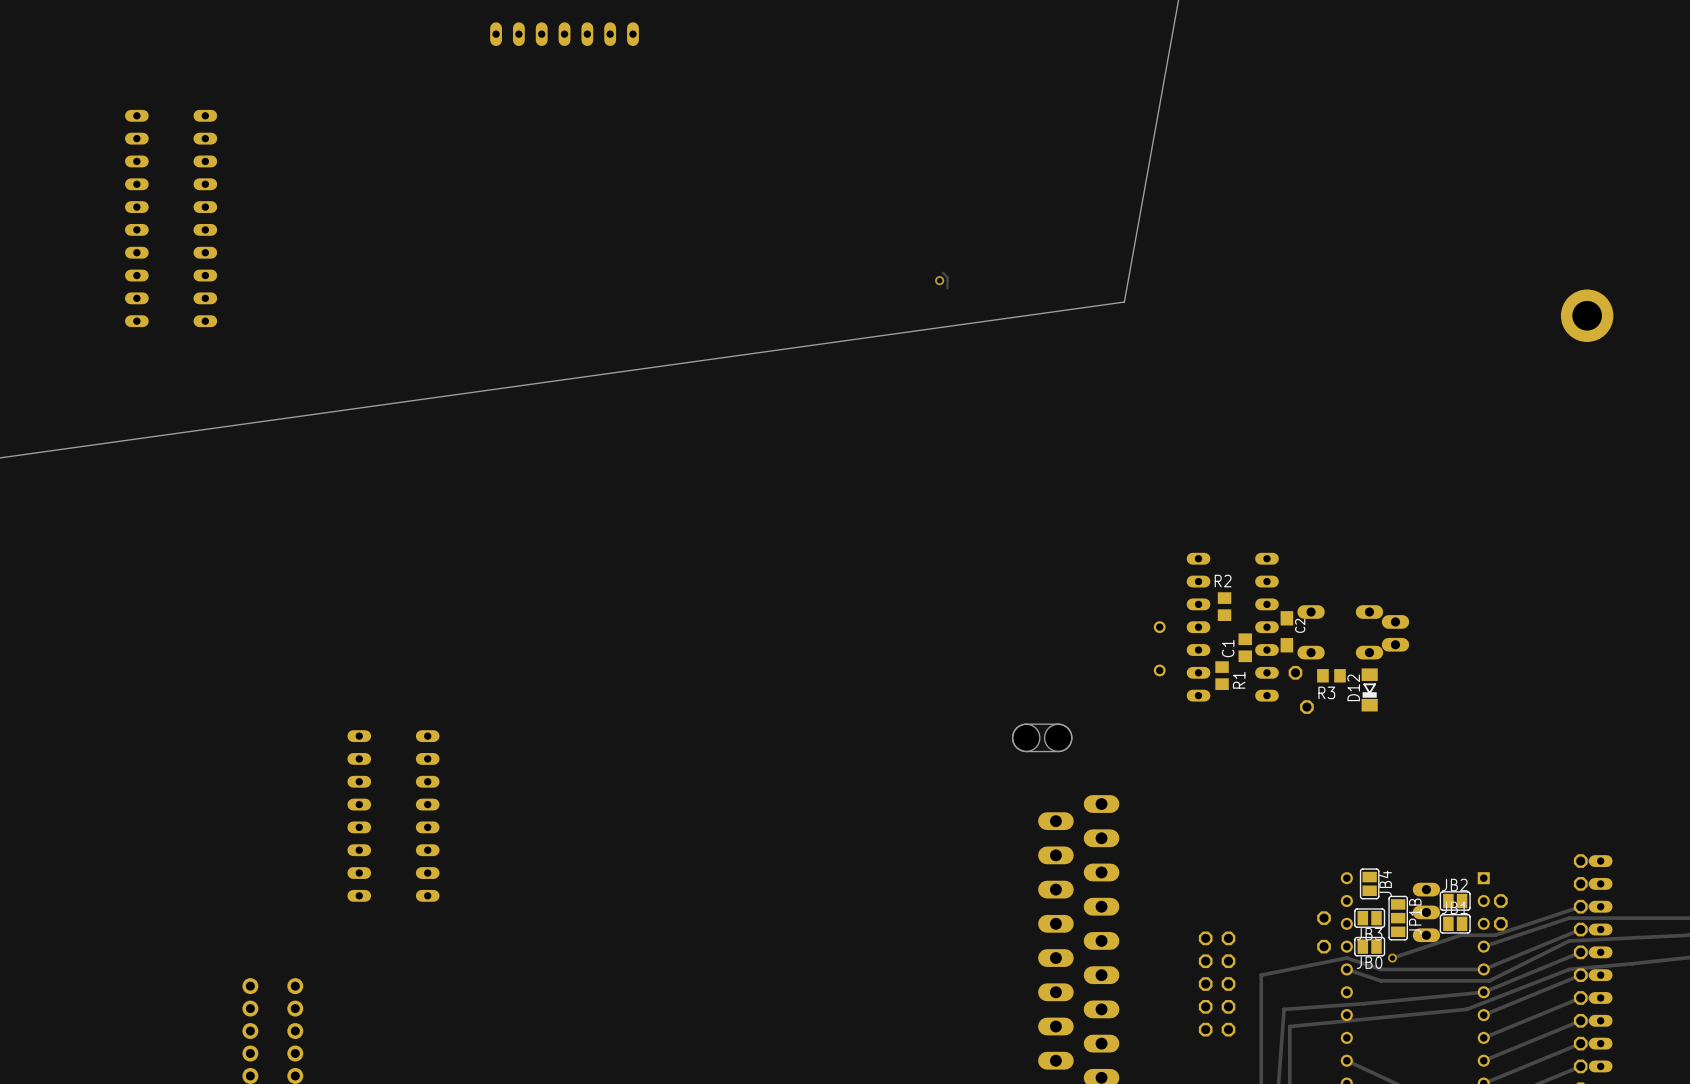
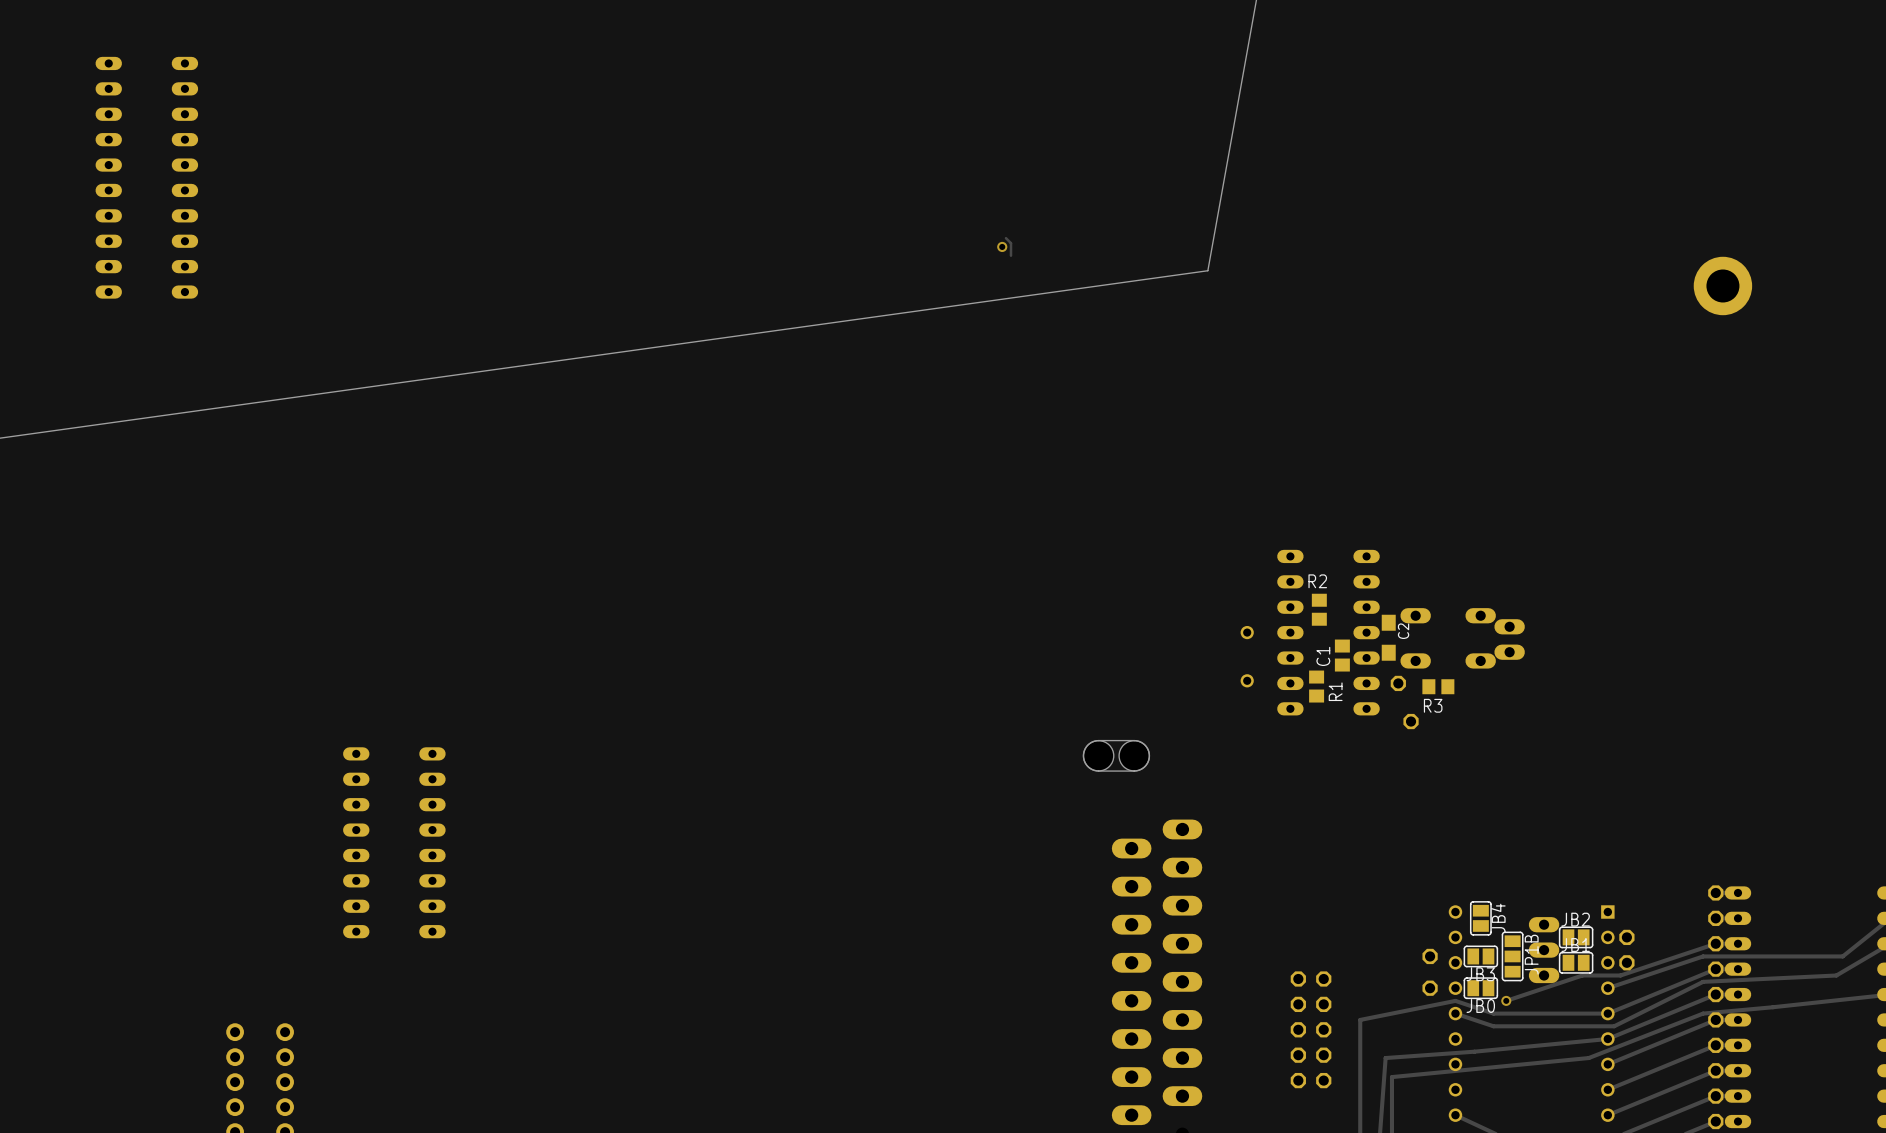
D12: (1369, 689) -> none

